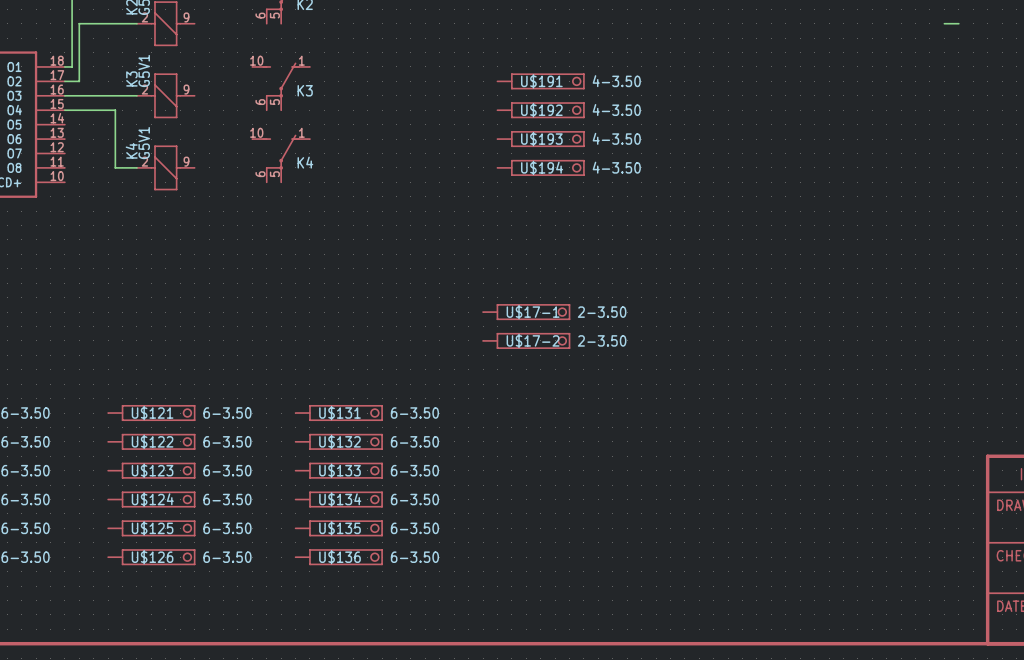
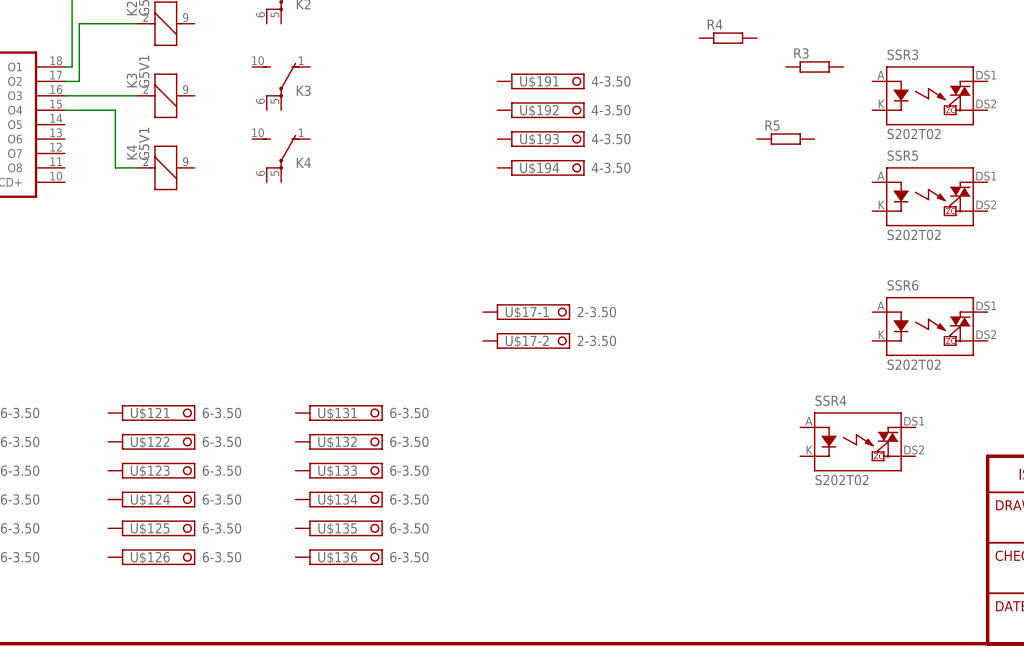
wire: (944, 23) (958, 23) -> none
R4: none -> (728, 38)
R3: none -> (814, 66)
SSR3: none -> S202T02 (929, 95)
R5: none -> (785, 139)
SSR5: none -> S202T02 (929, 196)
SSR6: none -> S202T02 (929, 326)
SSR4: none -> S202T02 (857, 441)

